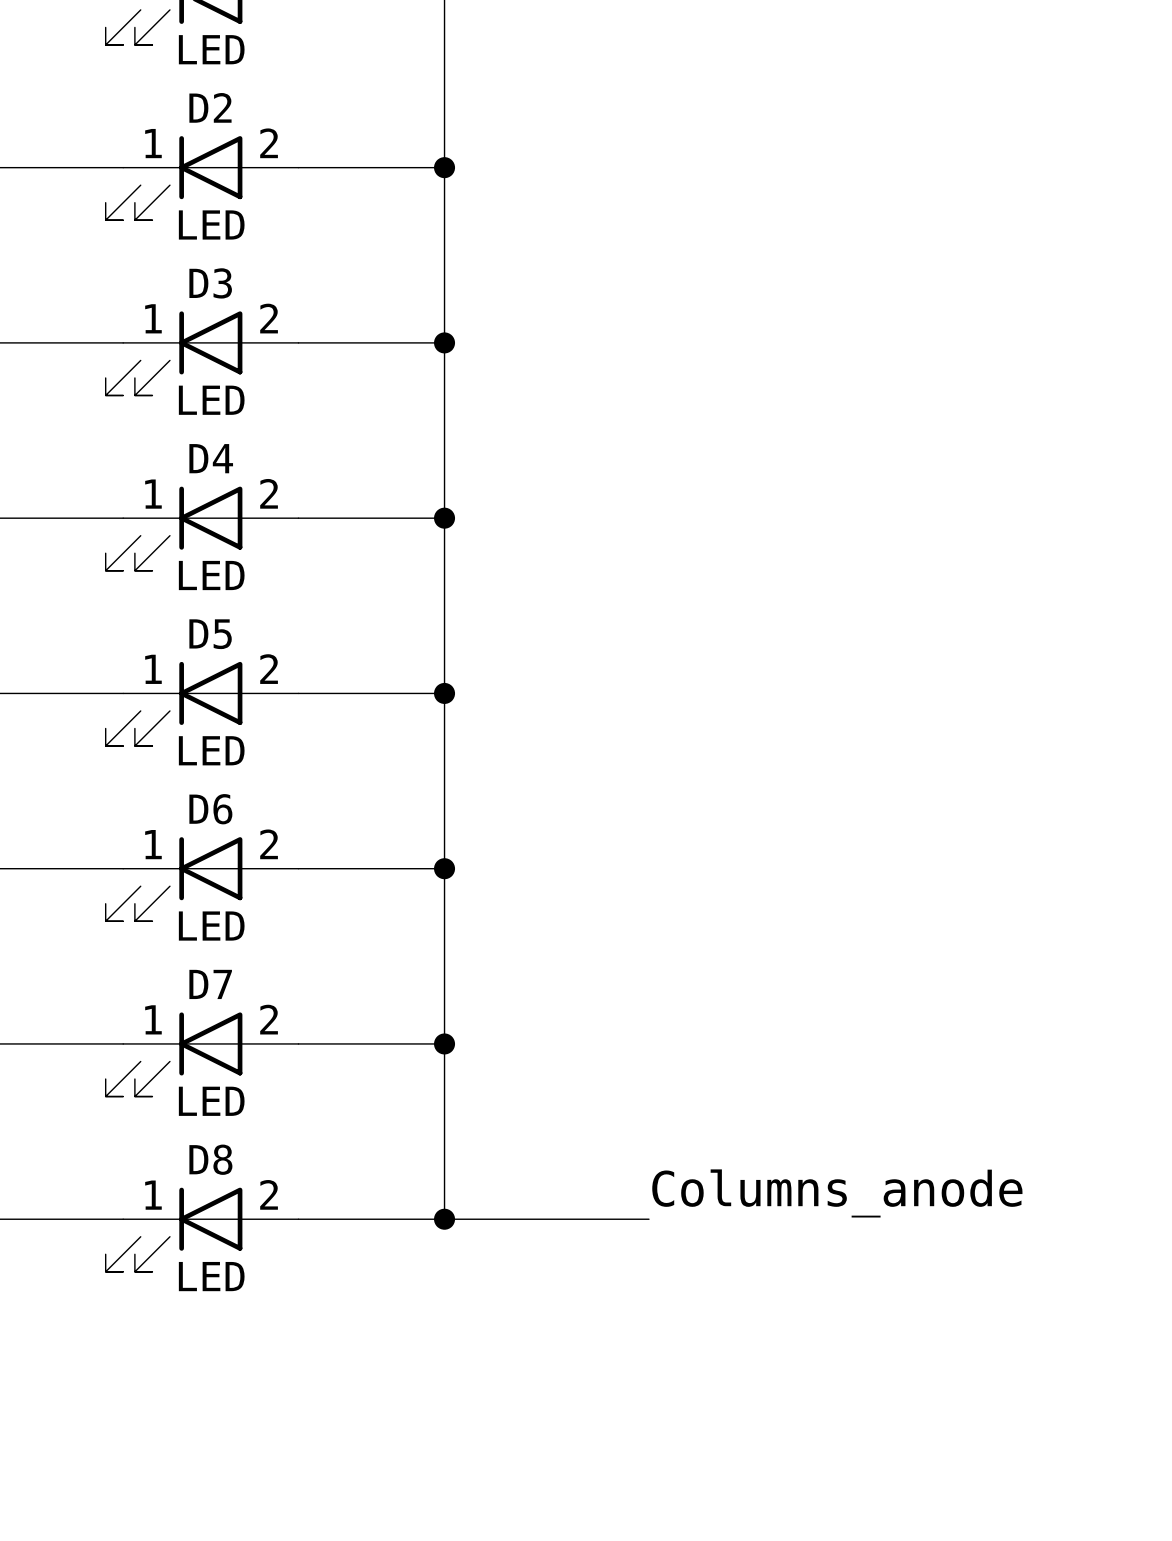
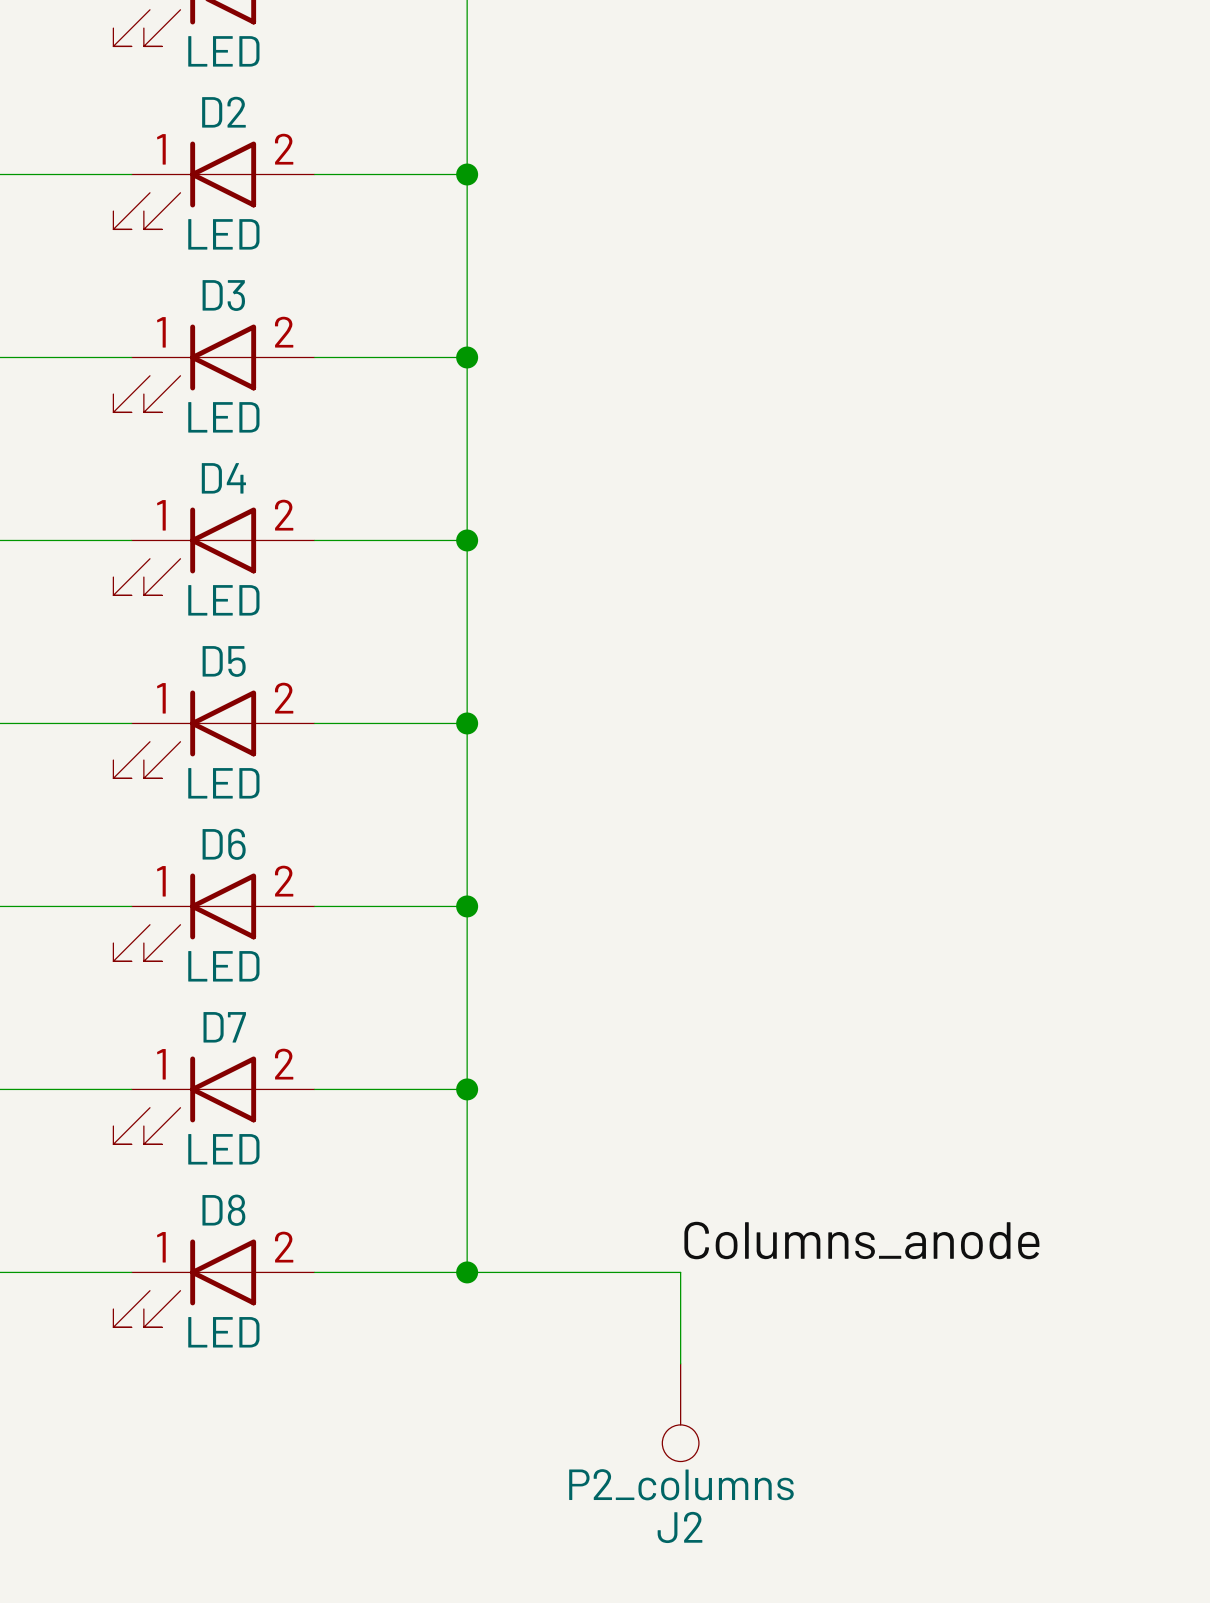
wire: none -> (680, 1272) (680, 1363)
J2: none -> P2_columns (680, 1412)

